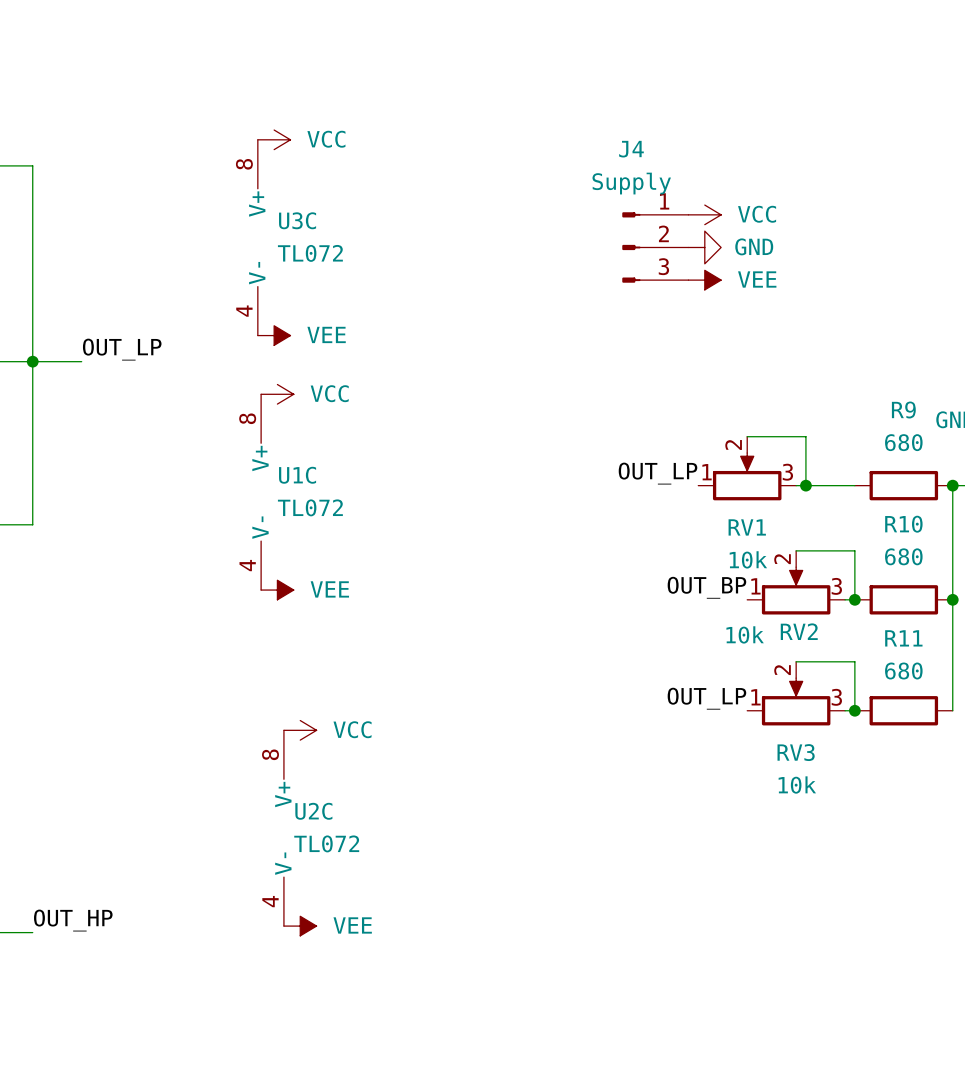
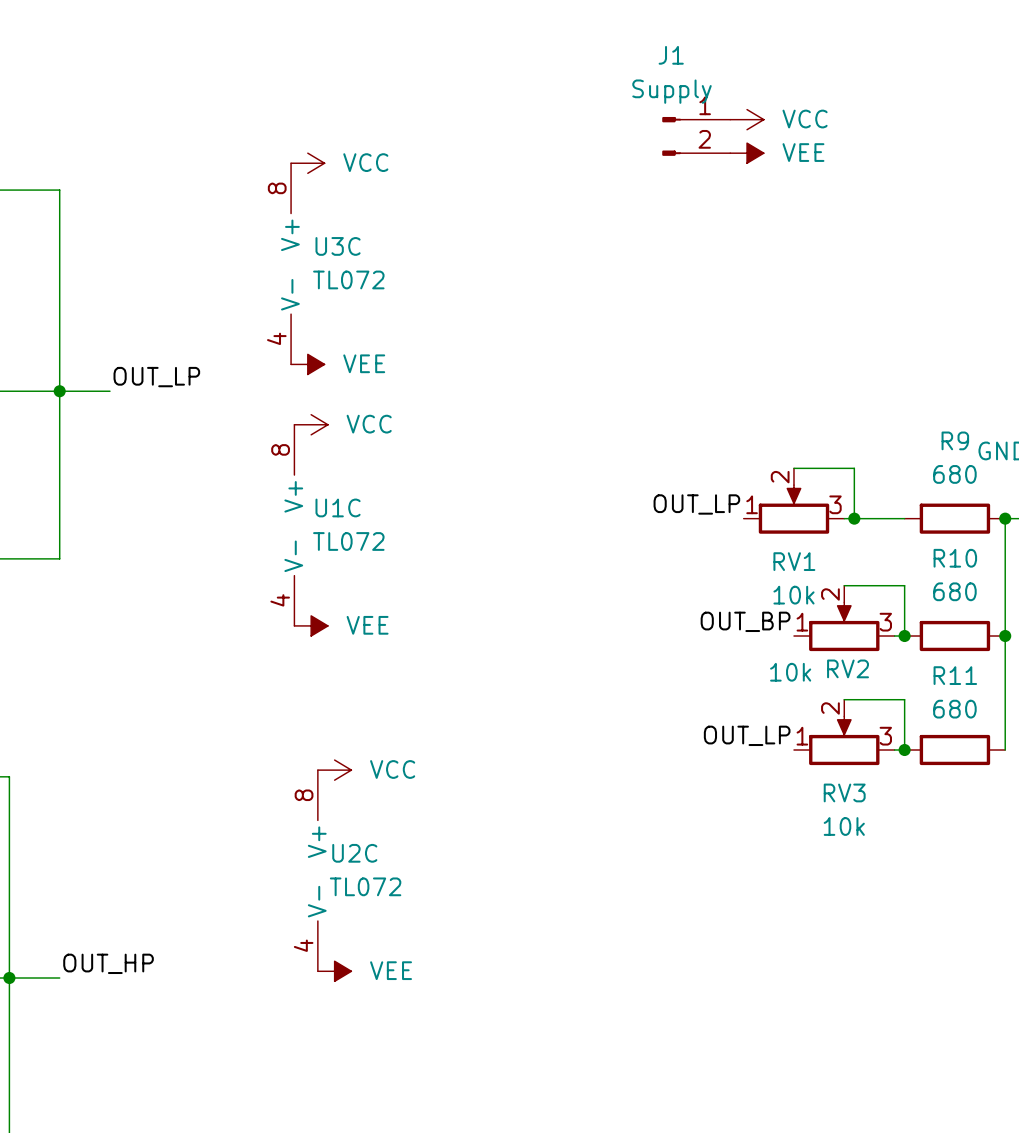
J1: none -> Supply (696, 136)
power symbol position: VCC (704, 214) -> VCC (747, 119)
J4: Supply (655, 247) -> none
power symbol: GND (704, 247) -> none
power symbol position: VEE (704, 280) -> VEE (747, 153)

